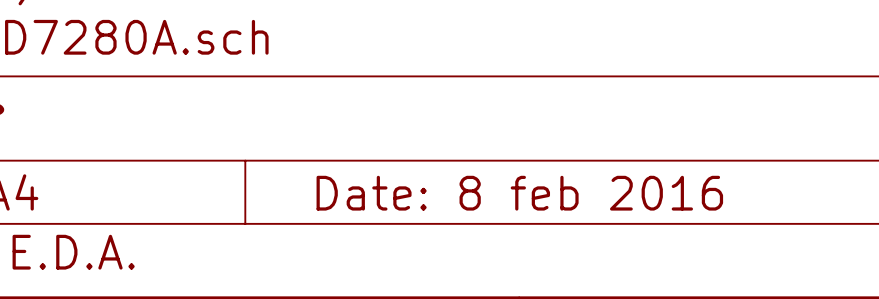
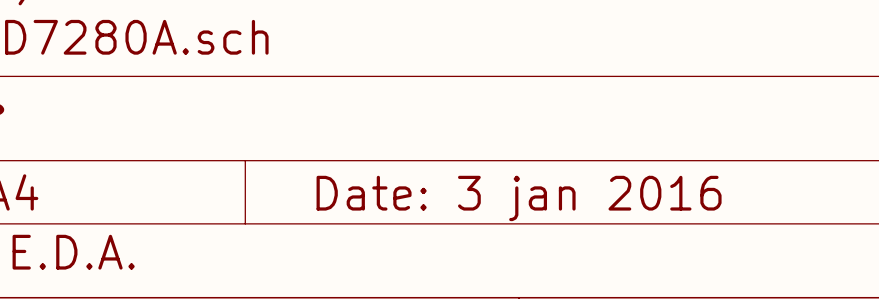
title block: Date: 8 feb 2016 (519, 193) -> Date: 3 jan 2016 (519, 198)

